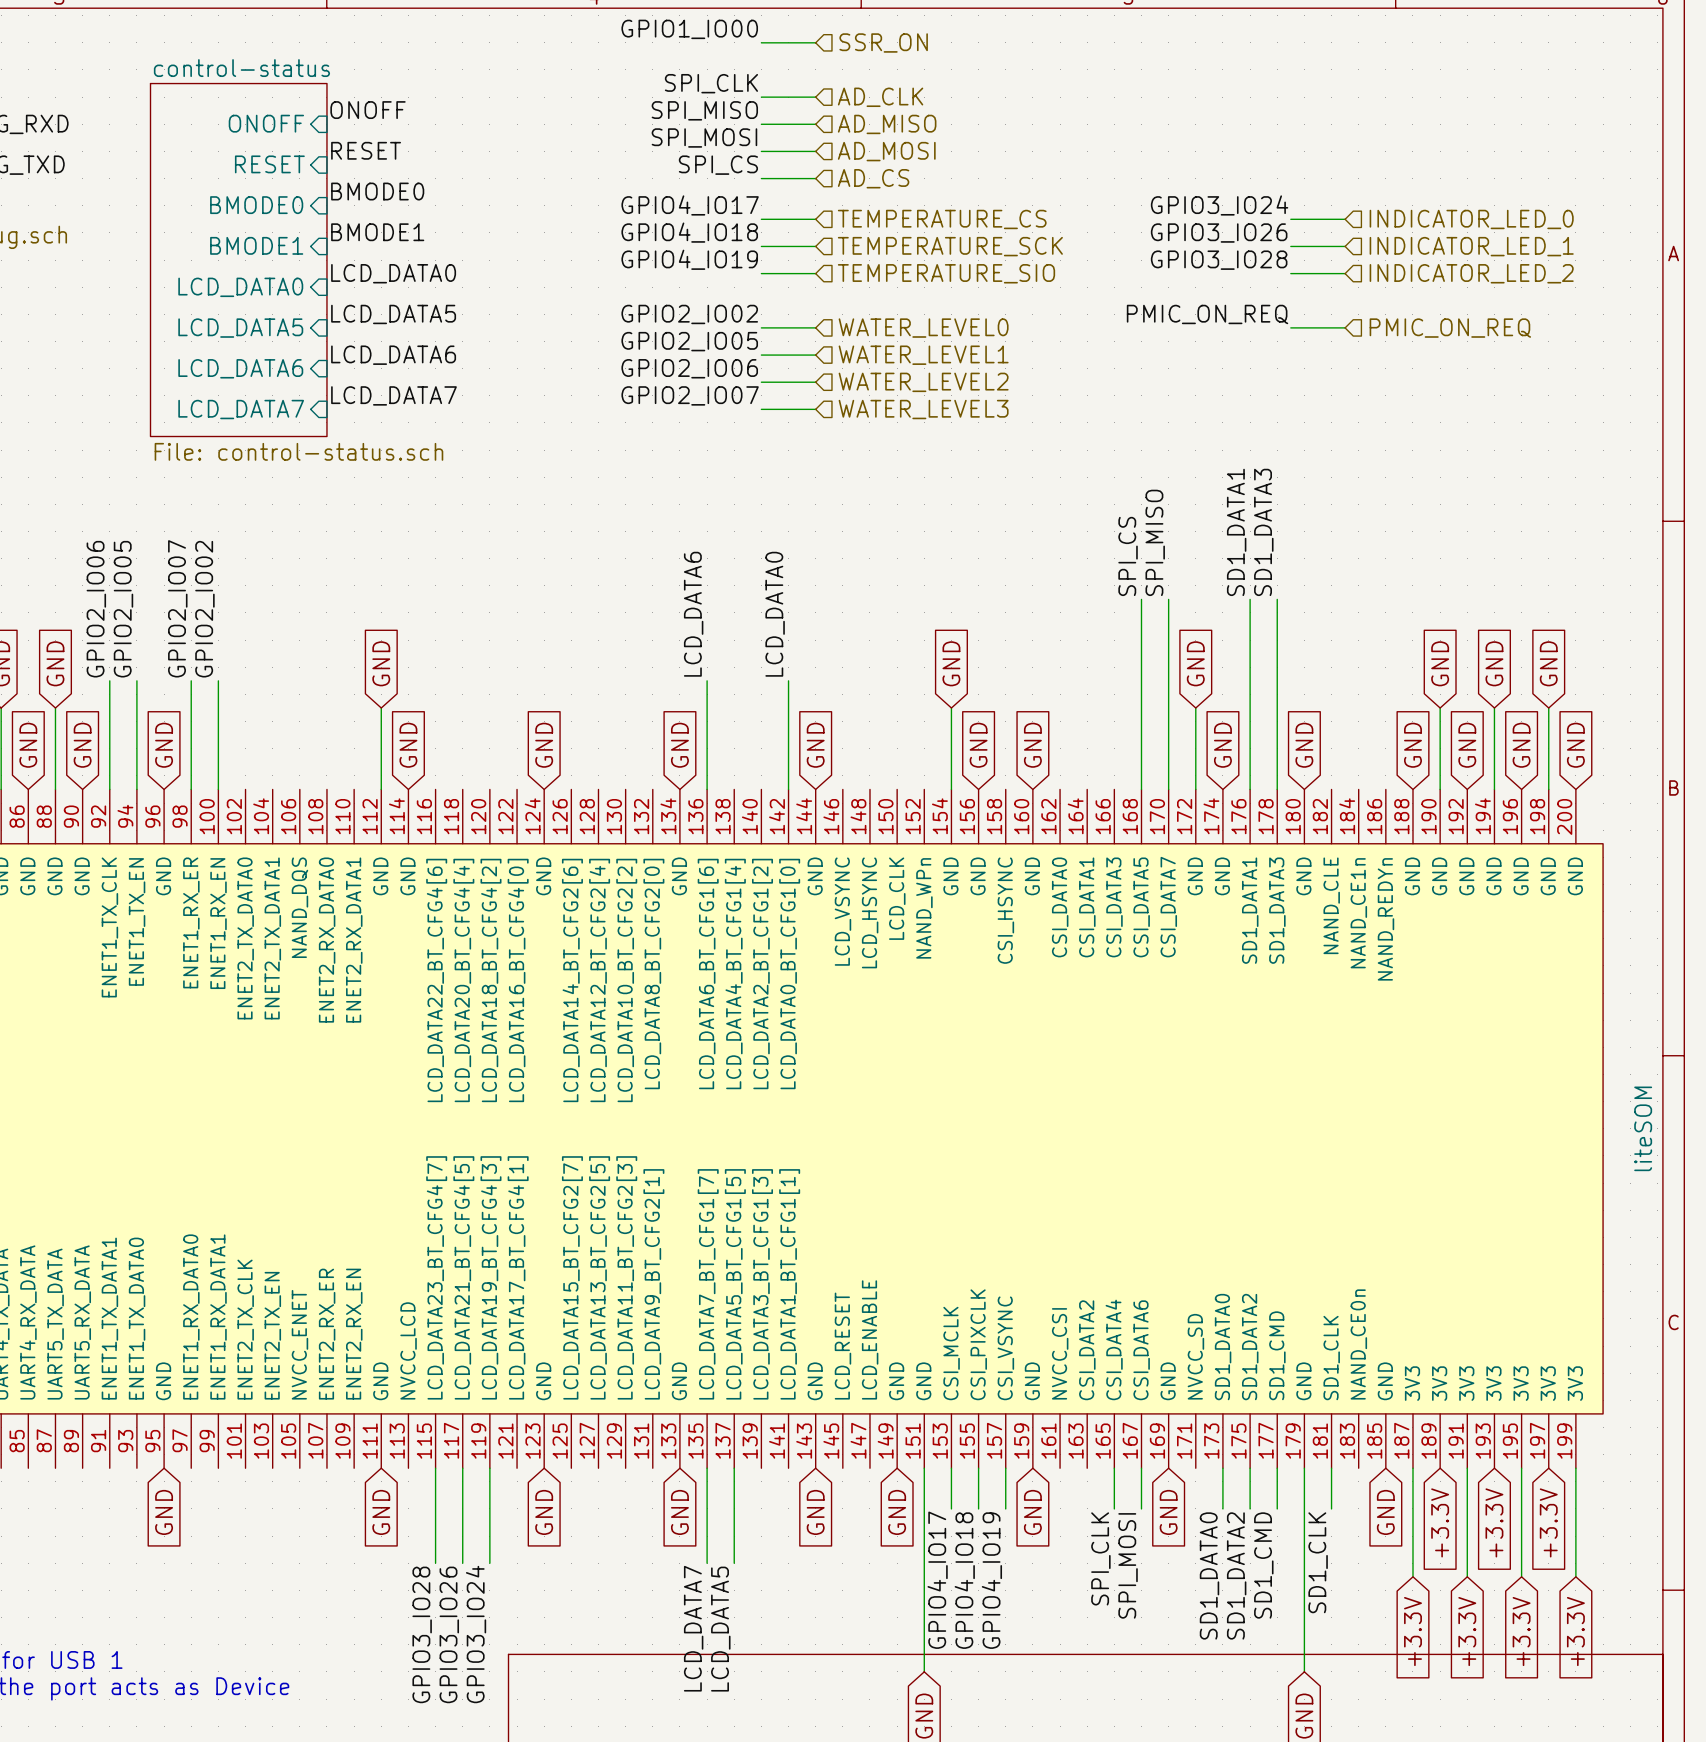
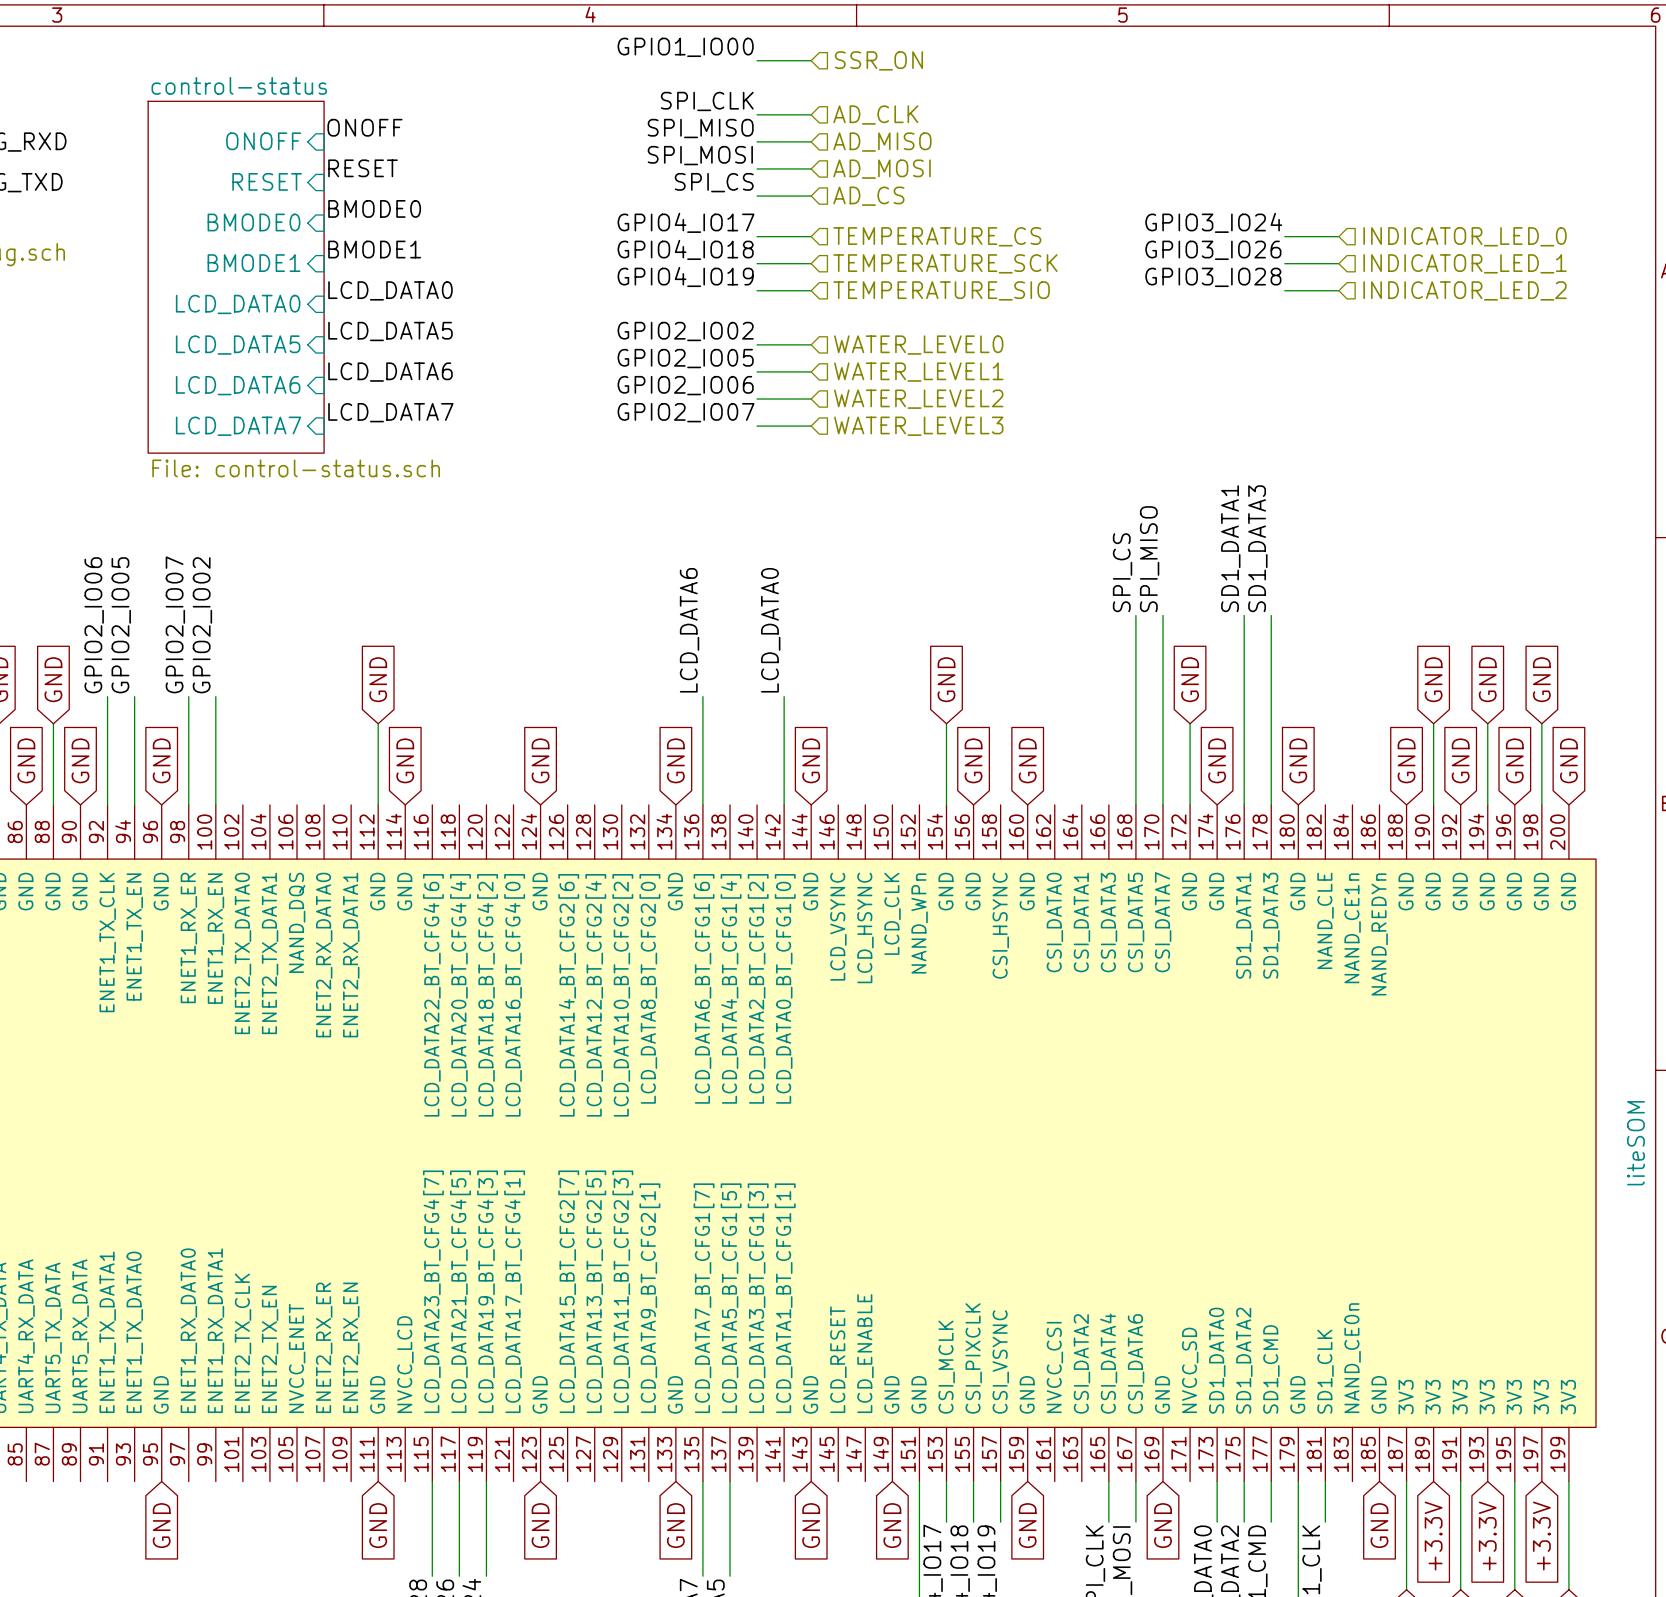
label: PMIC_ON_REQ (1207, 314) -> none
wire: (1290, 327) (1345, 327) -> none
hierarchical label: PMIC_ON_REQ (1450, 328) -> none

